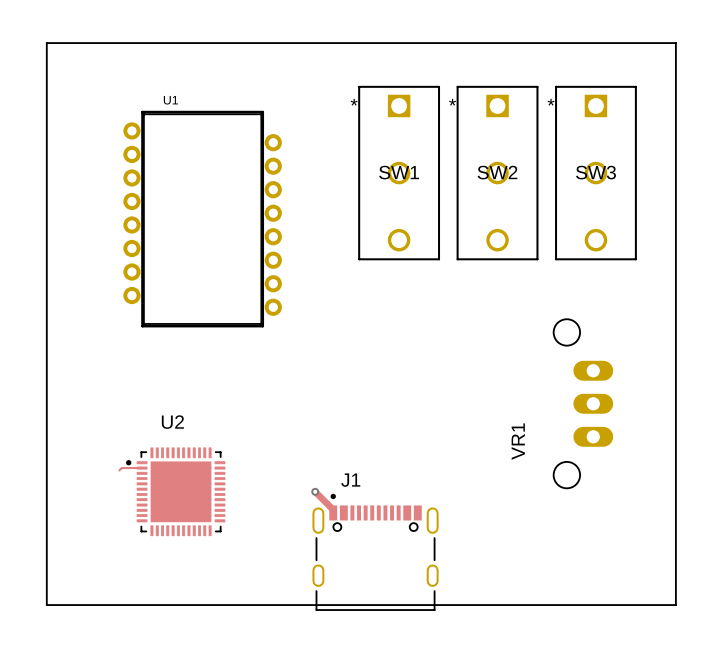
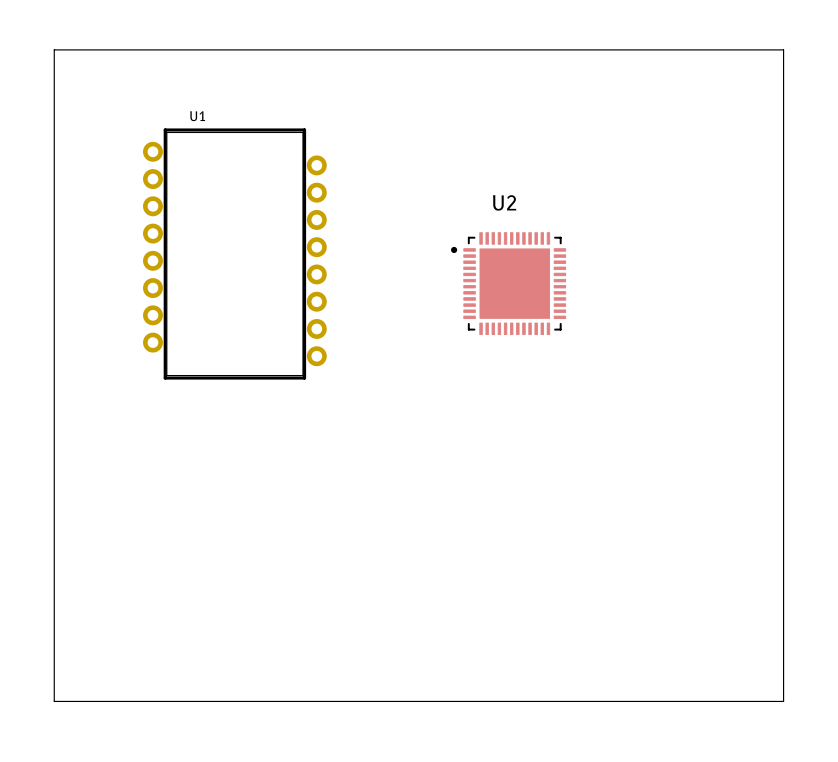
SW1: (399, 173) -> none
SW2: (497, 173) -> none
SW3: (595, 173) -> none
VR1: (583, 403) -> none
track: (142, 468) (121, 468) (119, 470) -> none
U2 position: (175, 491) -> (508, 283)
track: (315, 491) (333, 509) (333, 512) -> none
via: (315, 491) -> none
J1: (375, 552) -> none

